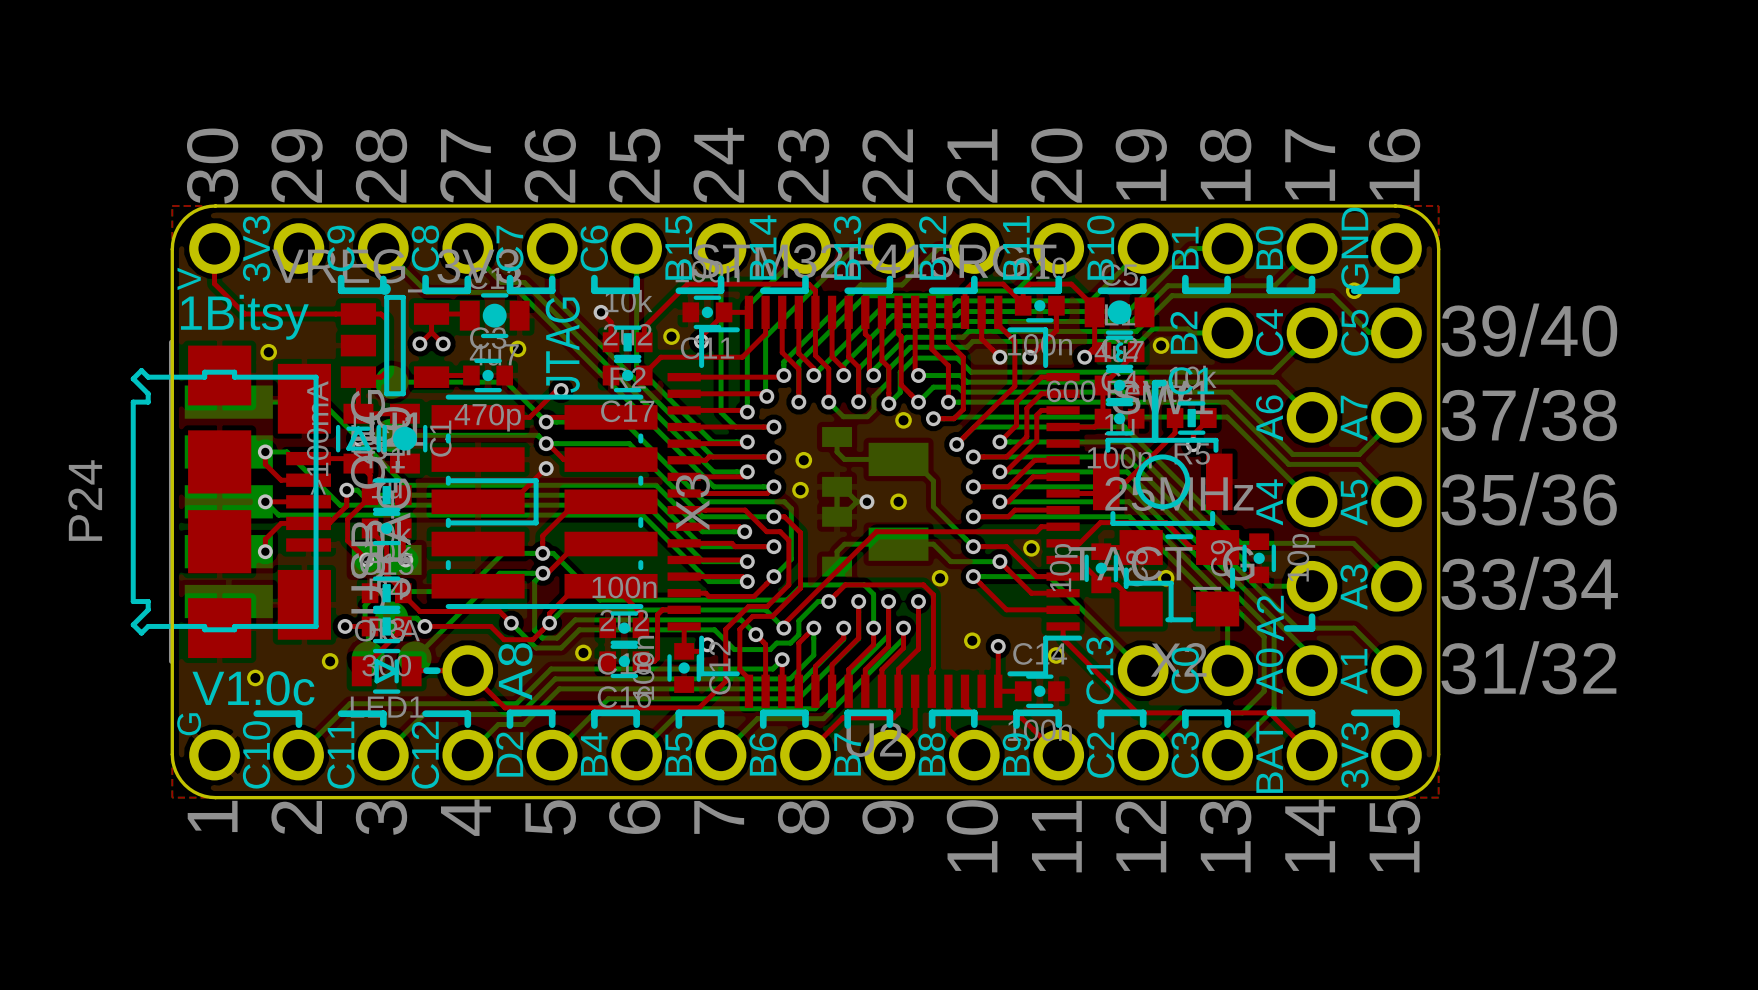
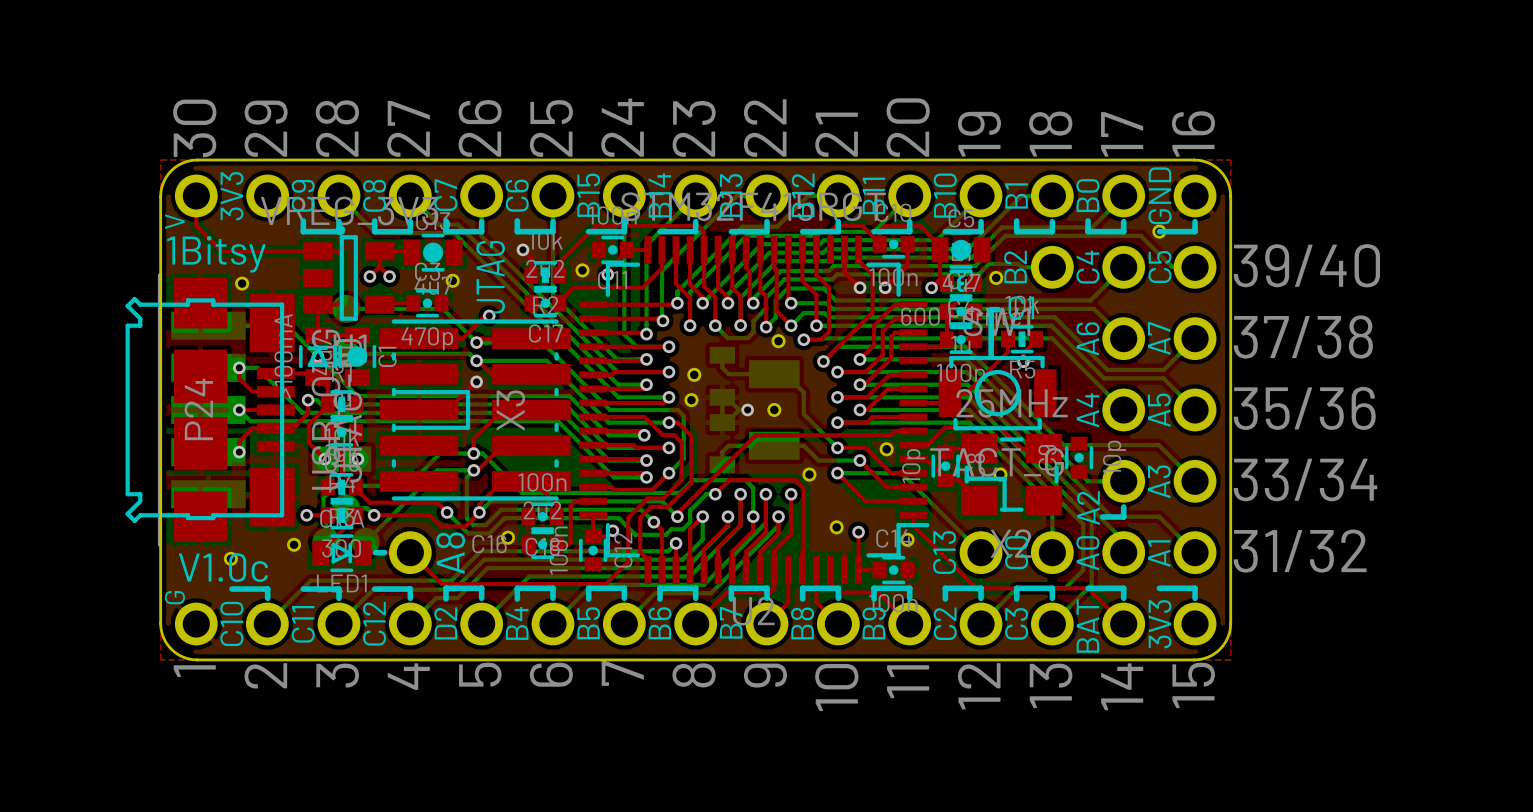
P24 name position: P24 (85, 500) -> P24 (198, 409)
X3 name position: X3 (692, 502) -> X3 (510, 410)
C16 name position: C16 (624, 697) -> C16 (489, 544)

